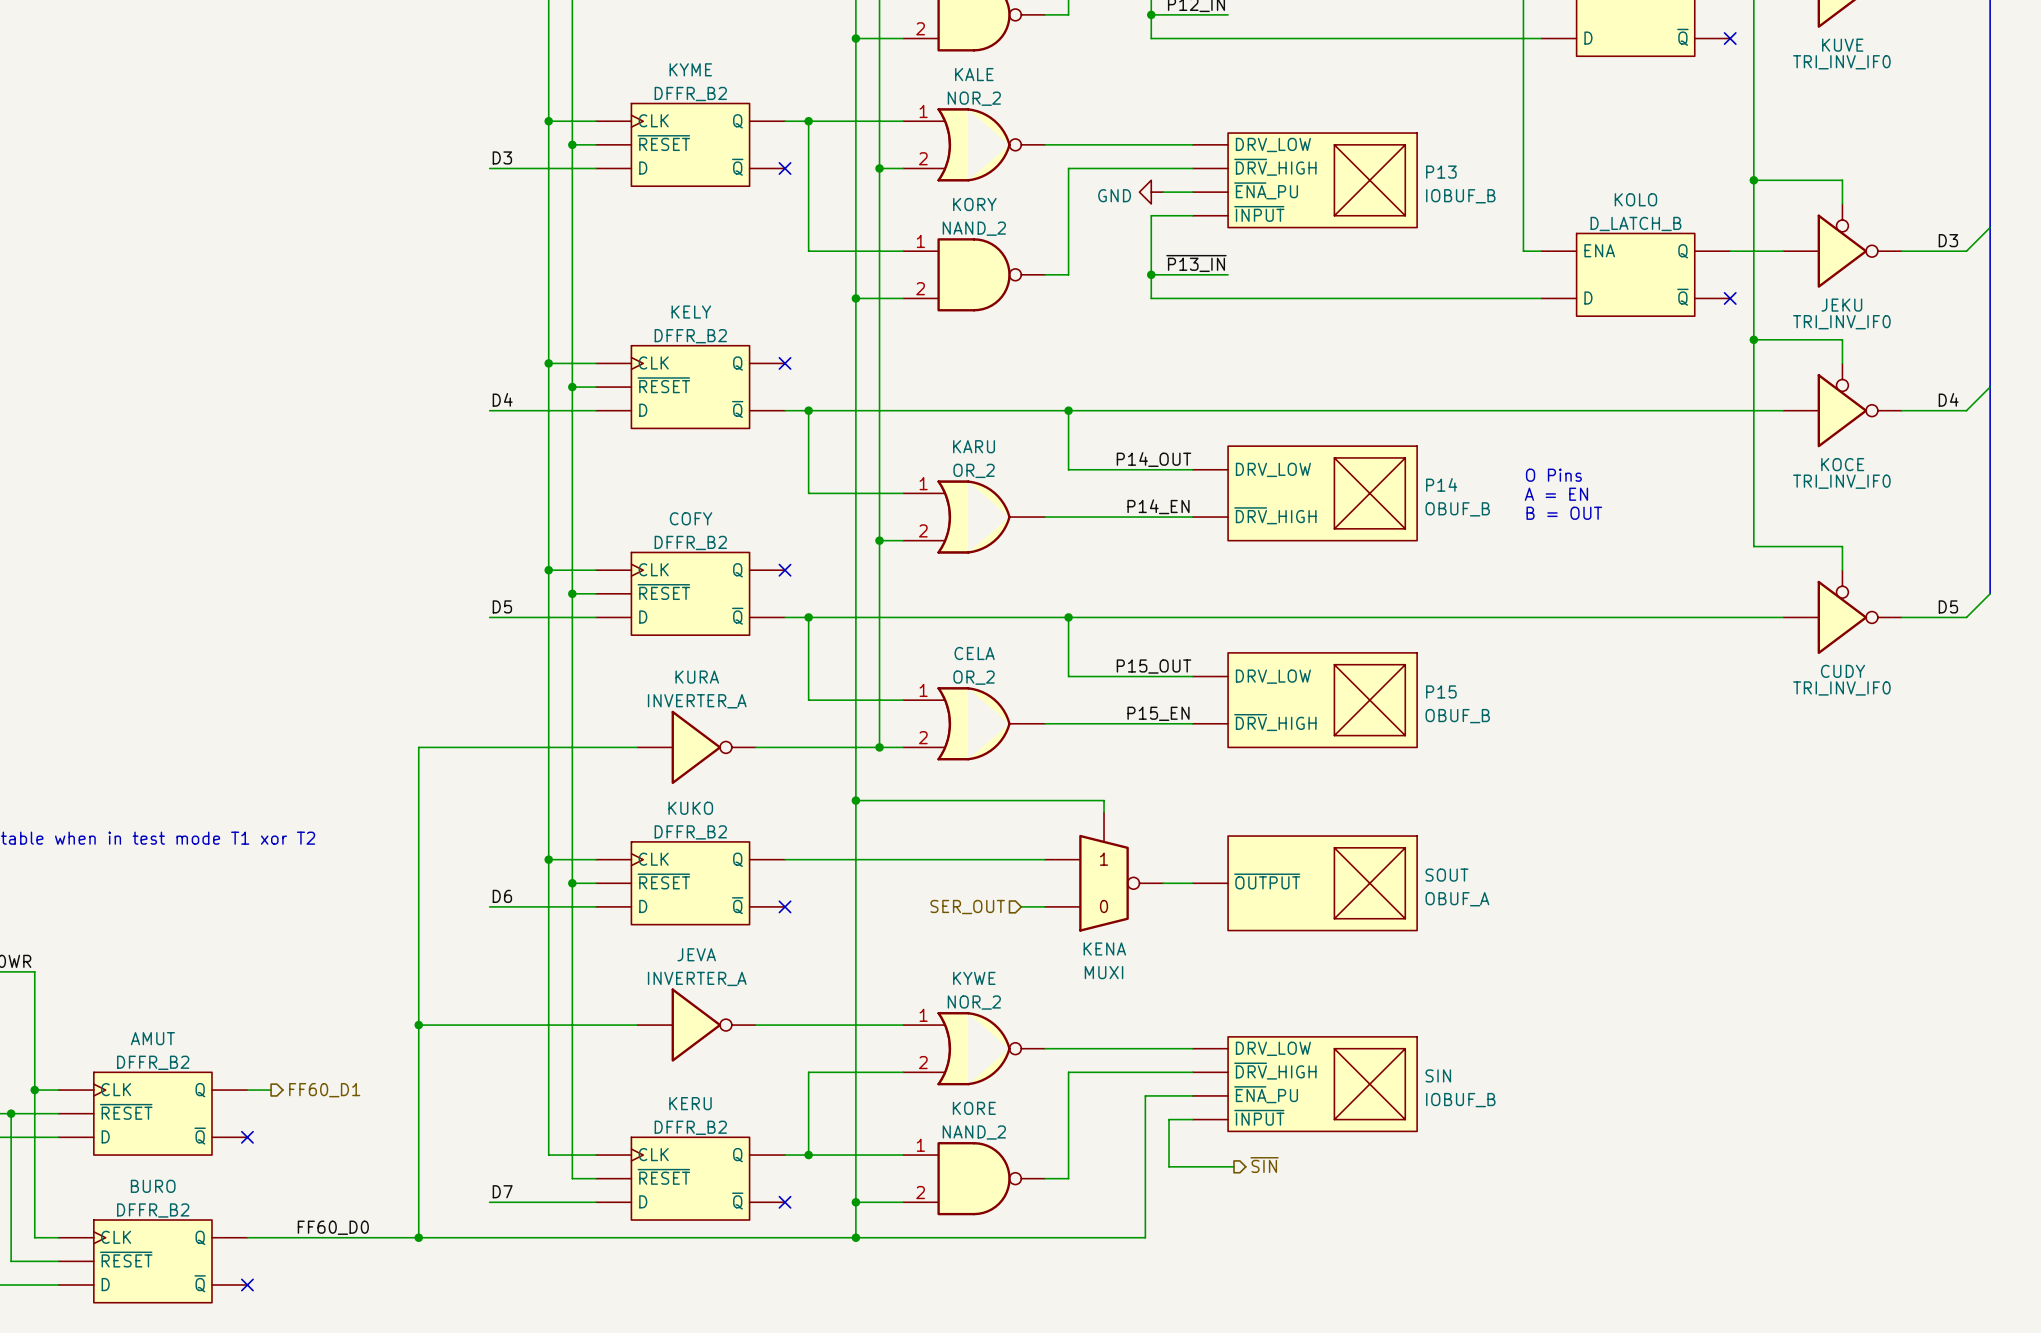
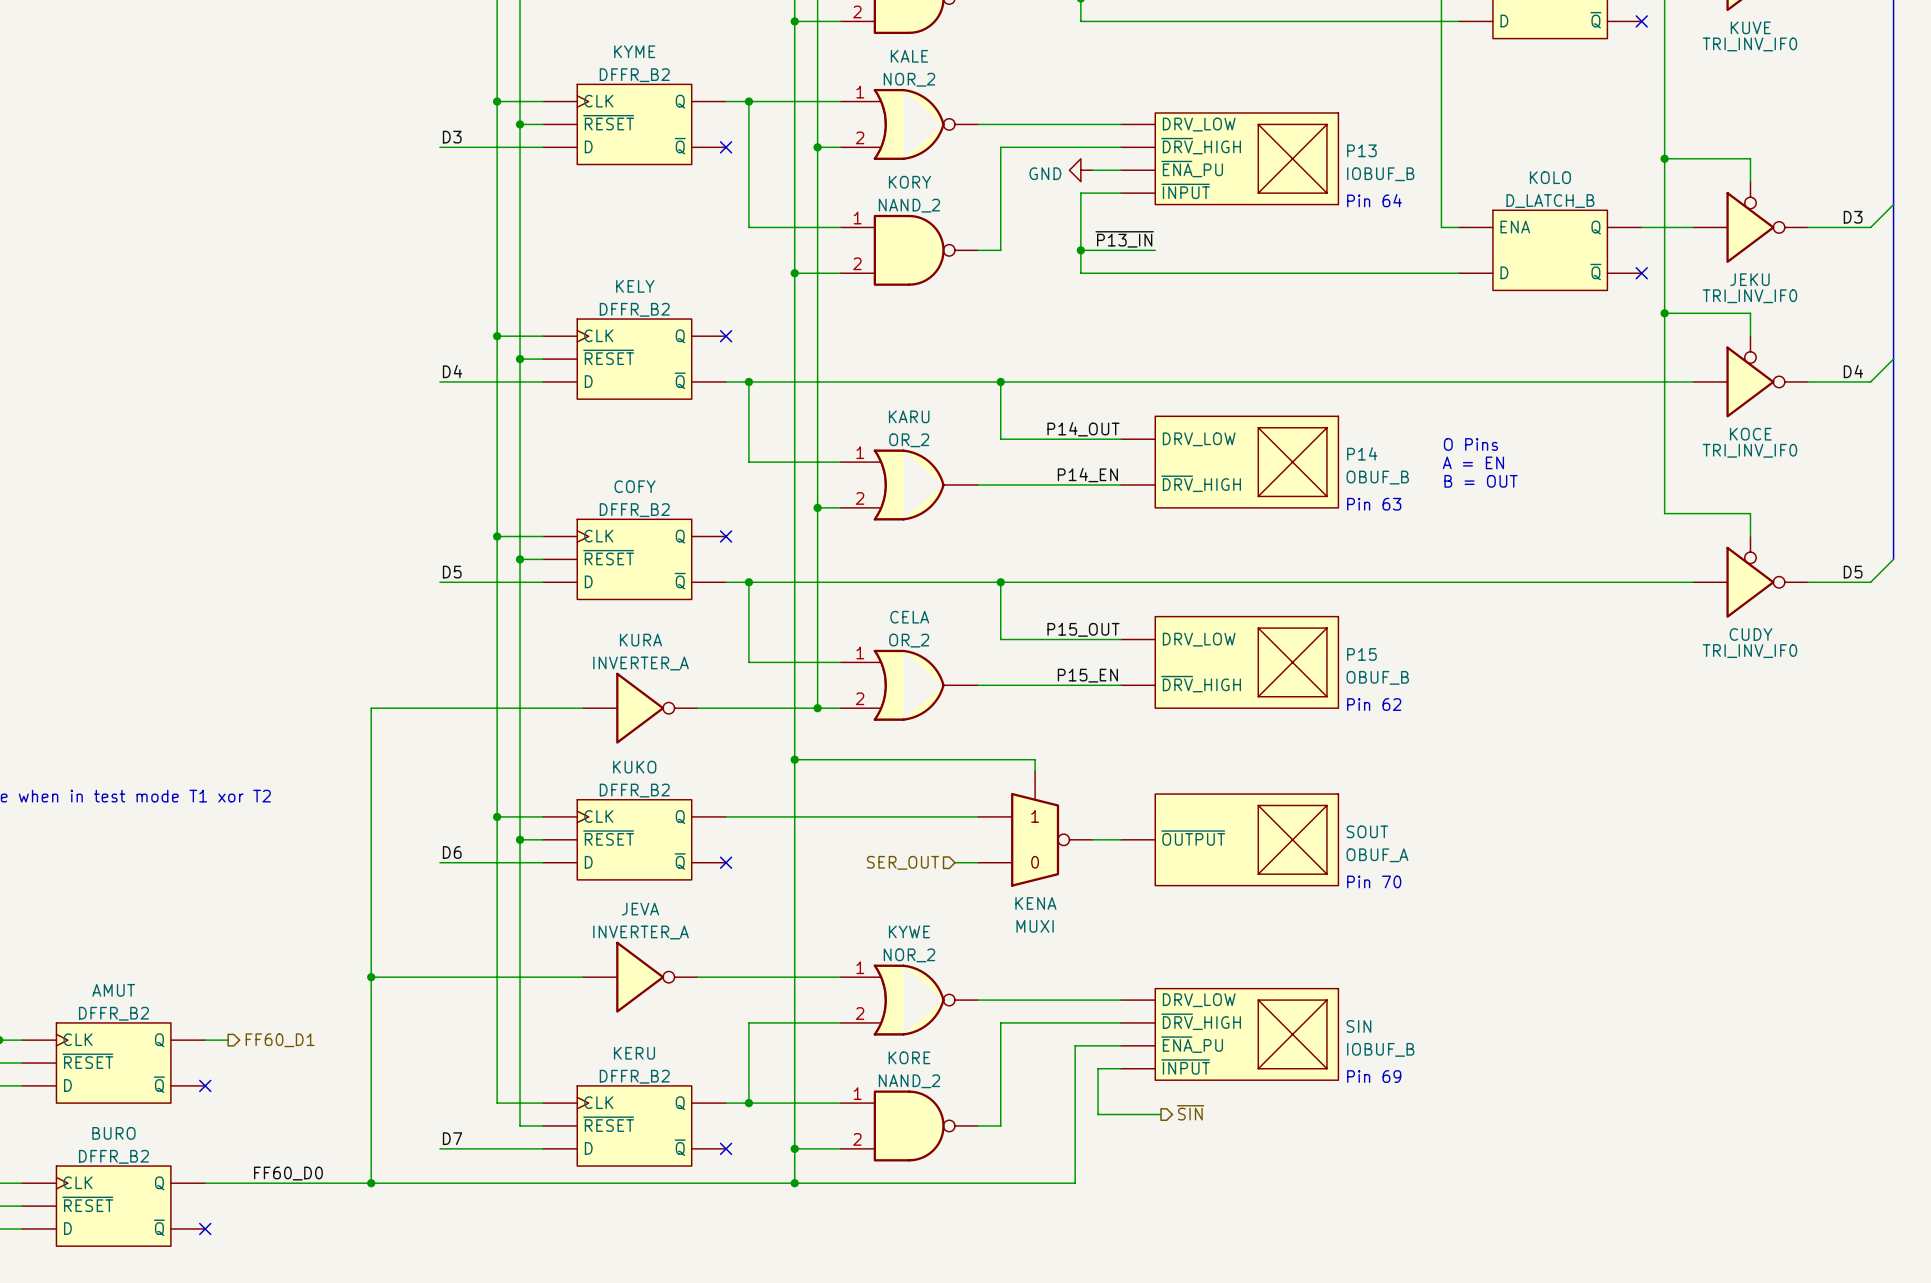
text: none -> Pin 64 (1374, 200)
text: none -> Pin 63 (1374, 504)
text: none -> Pin 62 (1374, 704)
text: none -> Pin 70 (1374, 881)
text: none -> Pin 69 (1374, 1076)

